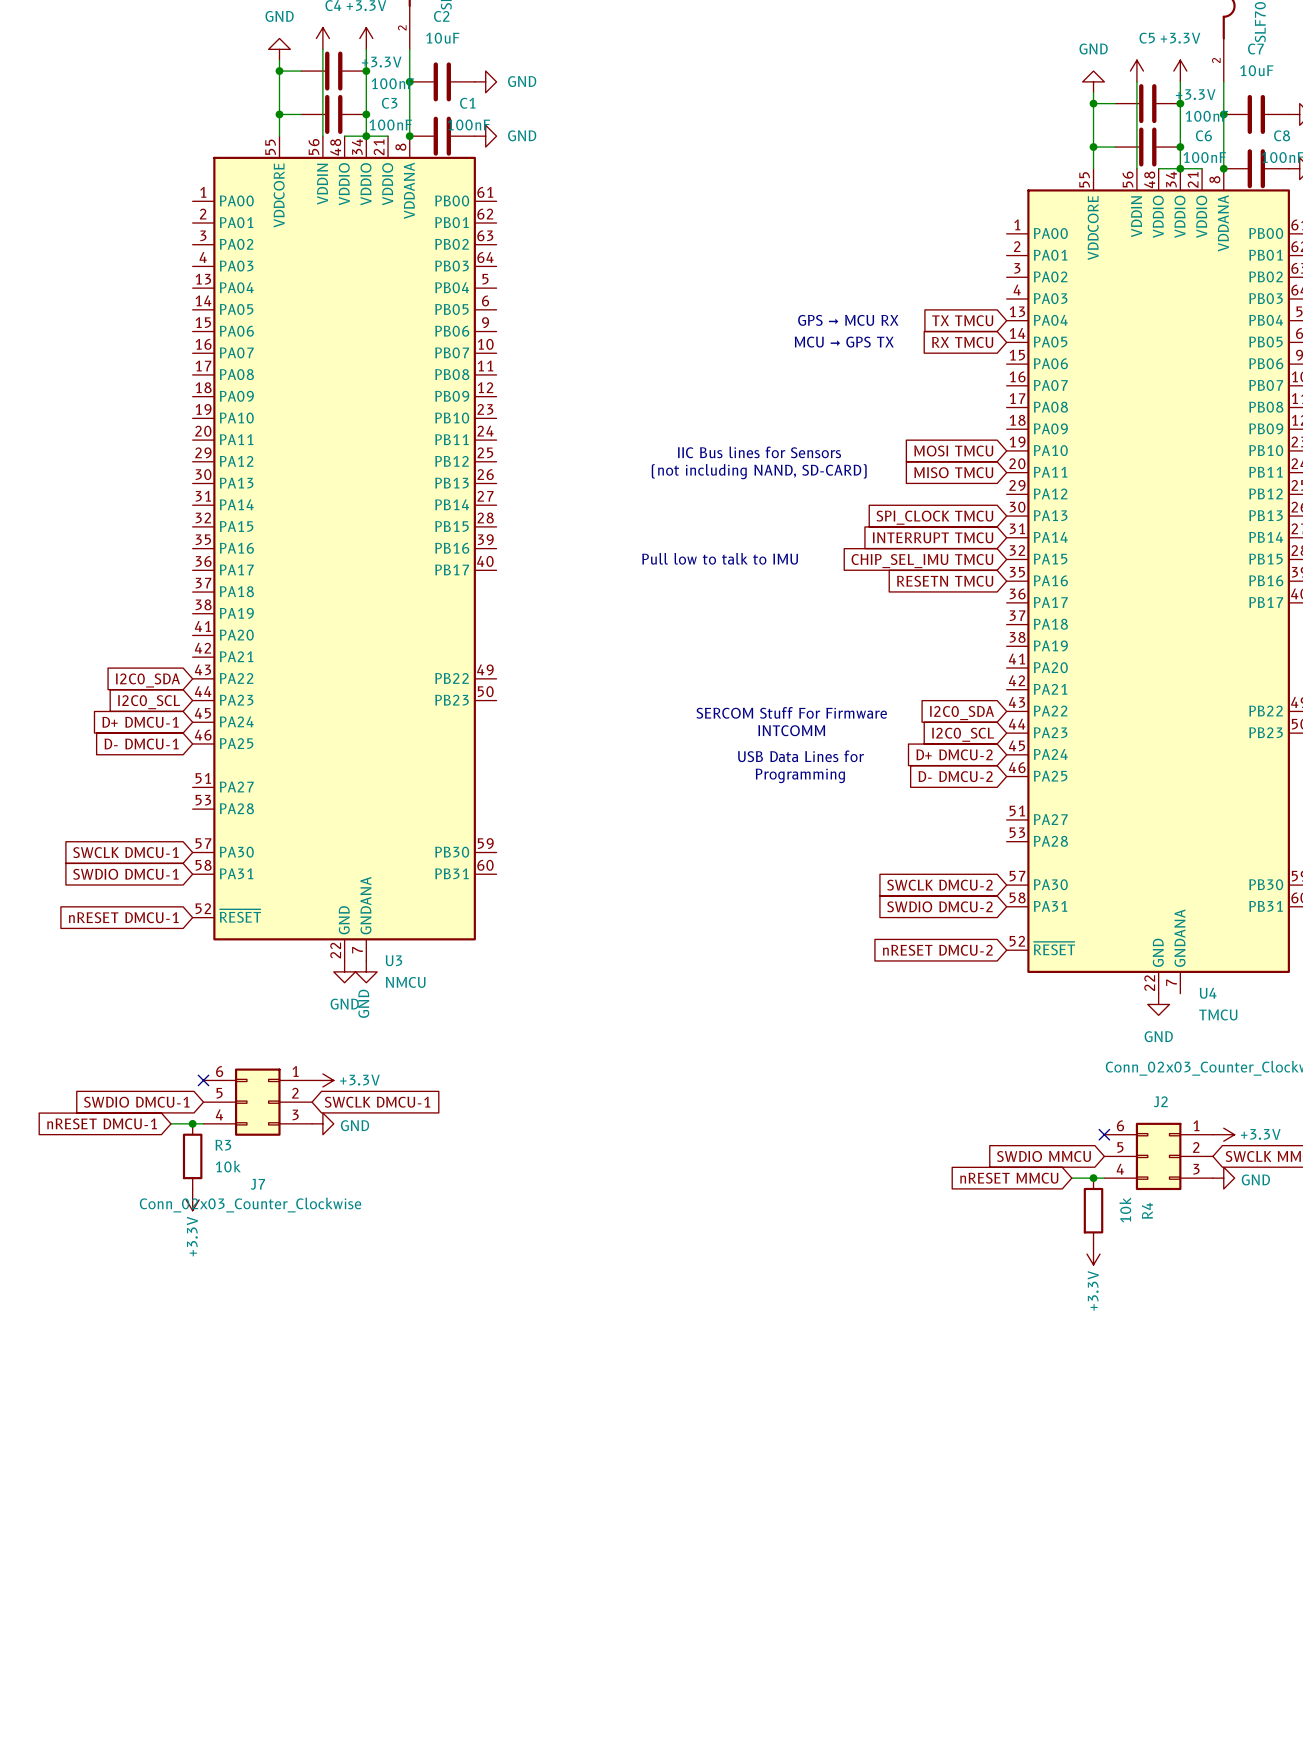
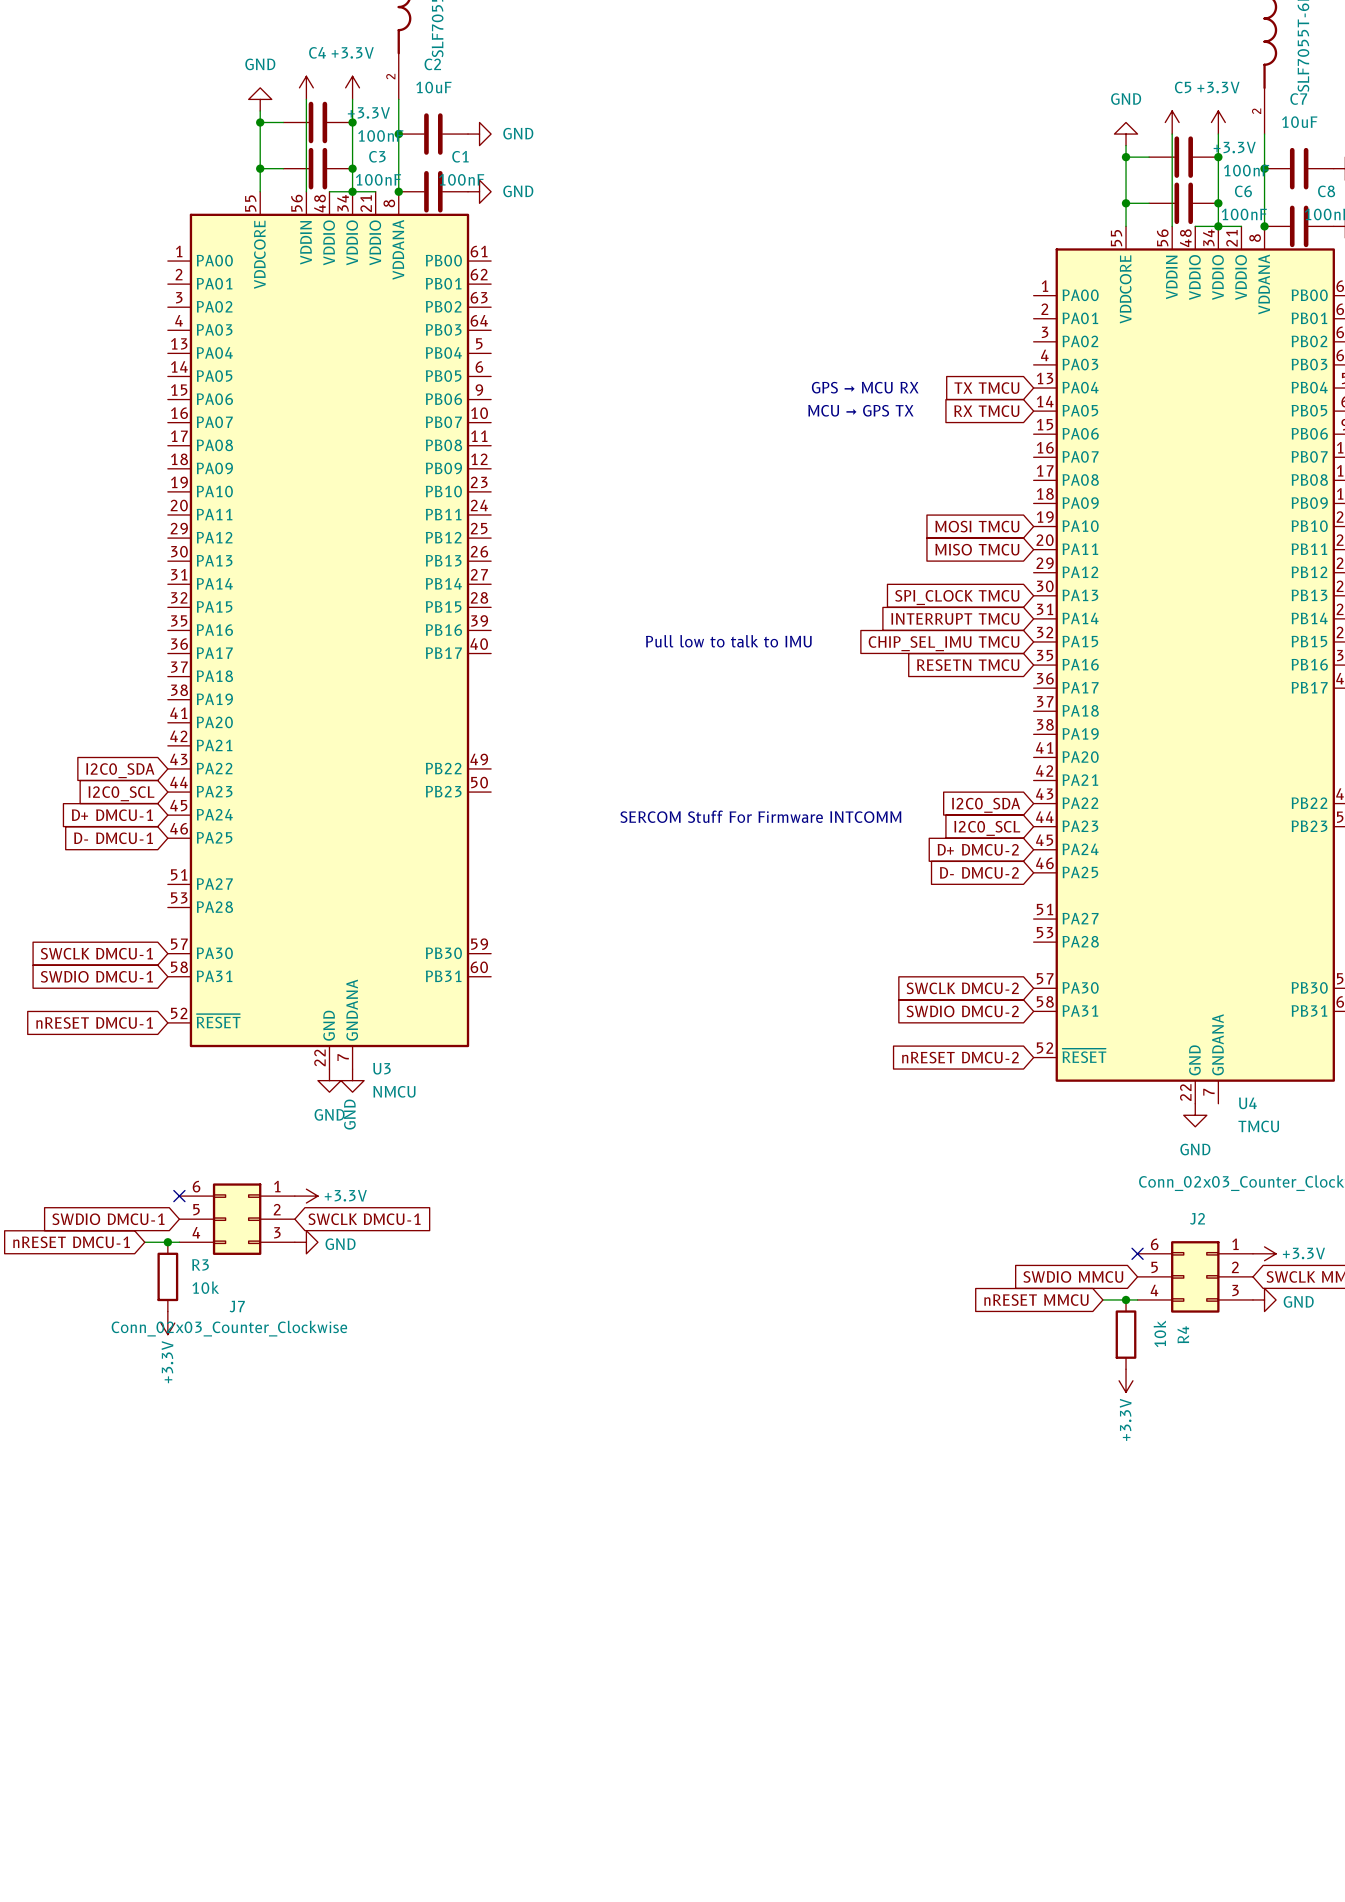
text: IIC Bus lines for Sensors (759, 452) -> none
text: (not including NAND, SD-CARD) (759, 471) -> none
text: SERCOM Stuff For Firmware (791, 712) -> SERCOM Stuff For Firmware INTCOMM (760, 816)
text: INTCOMM (791, 730) -> none
text: USB Data Lines for (801, 756) -> none
text: Programming (800, 775) -> none

